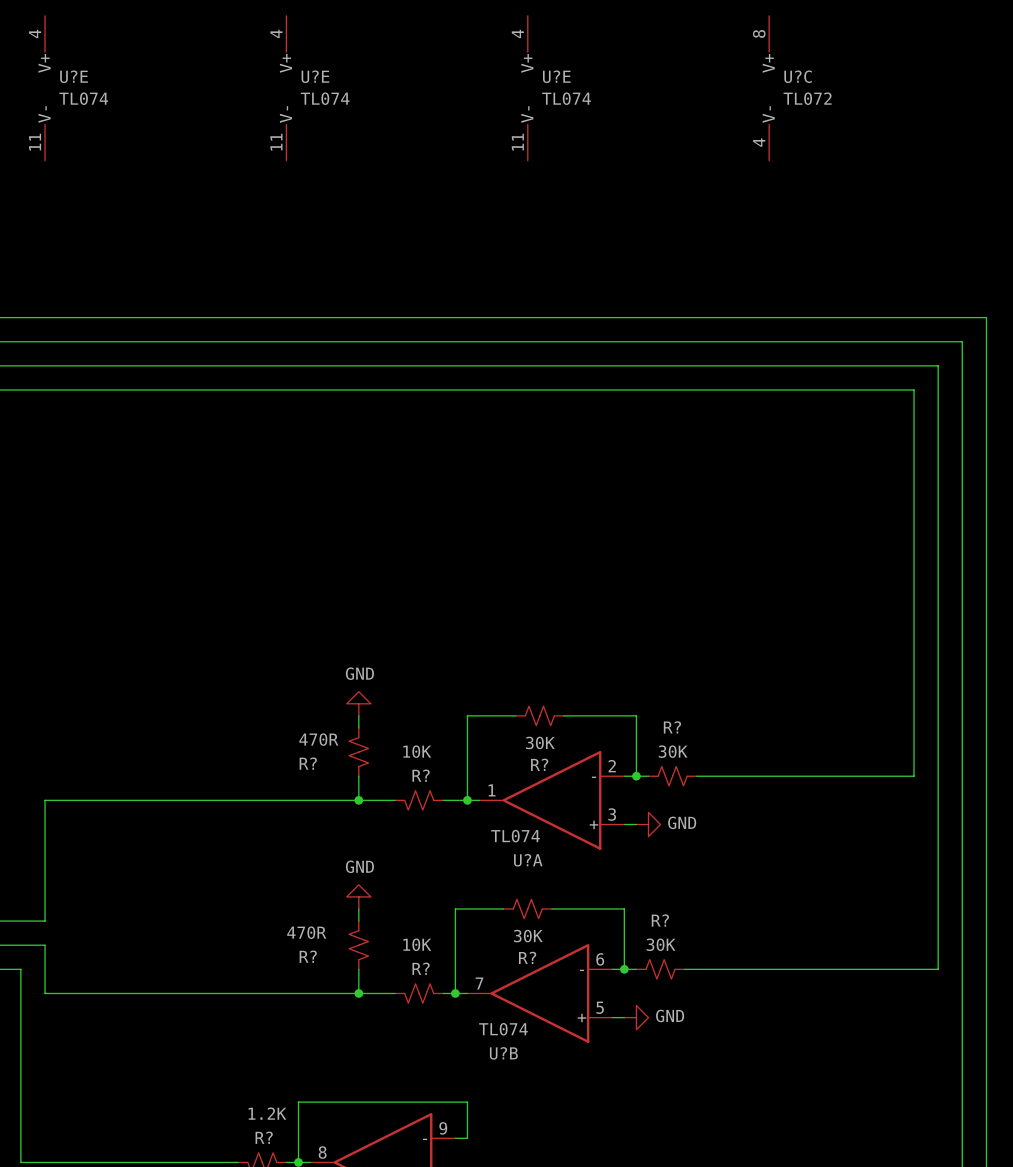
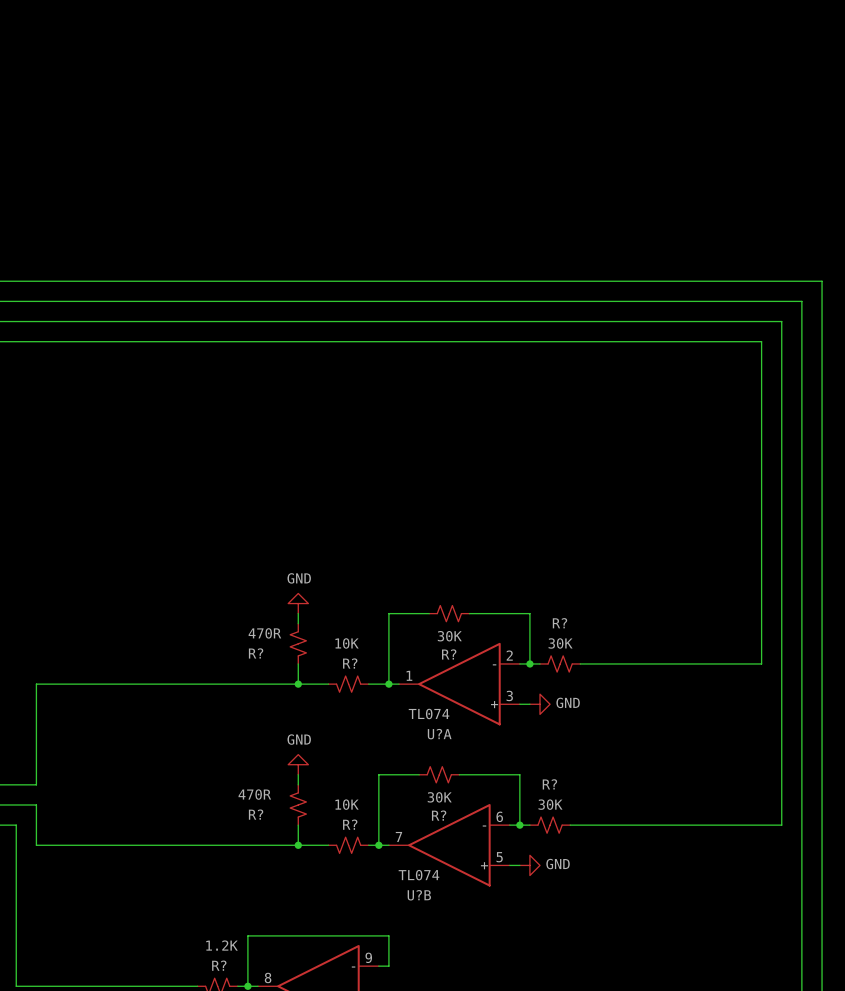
U?E: TL074 (45, 88) -> none
U?E: TL074 (286, 88) -> none
U?E: TL074 (527, 88) -> none
U?C: TL072 (769, 88) -> none

